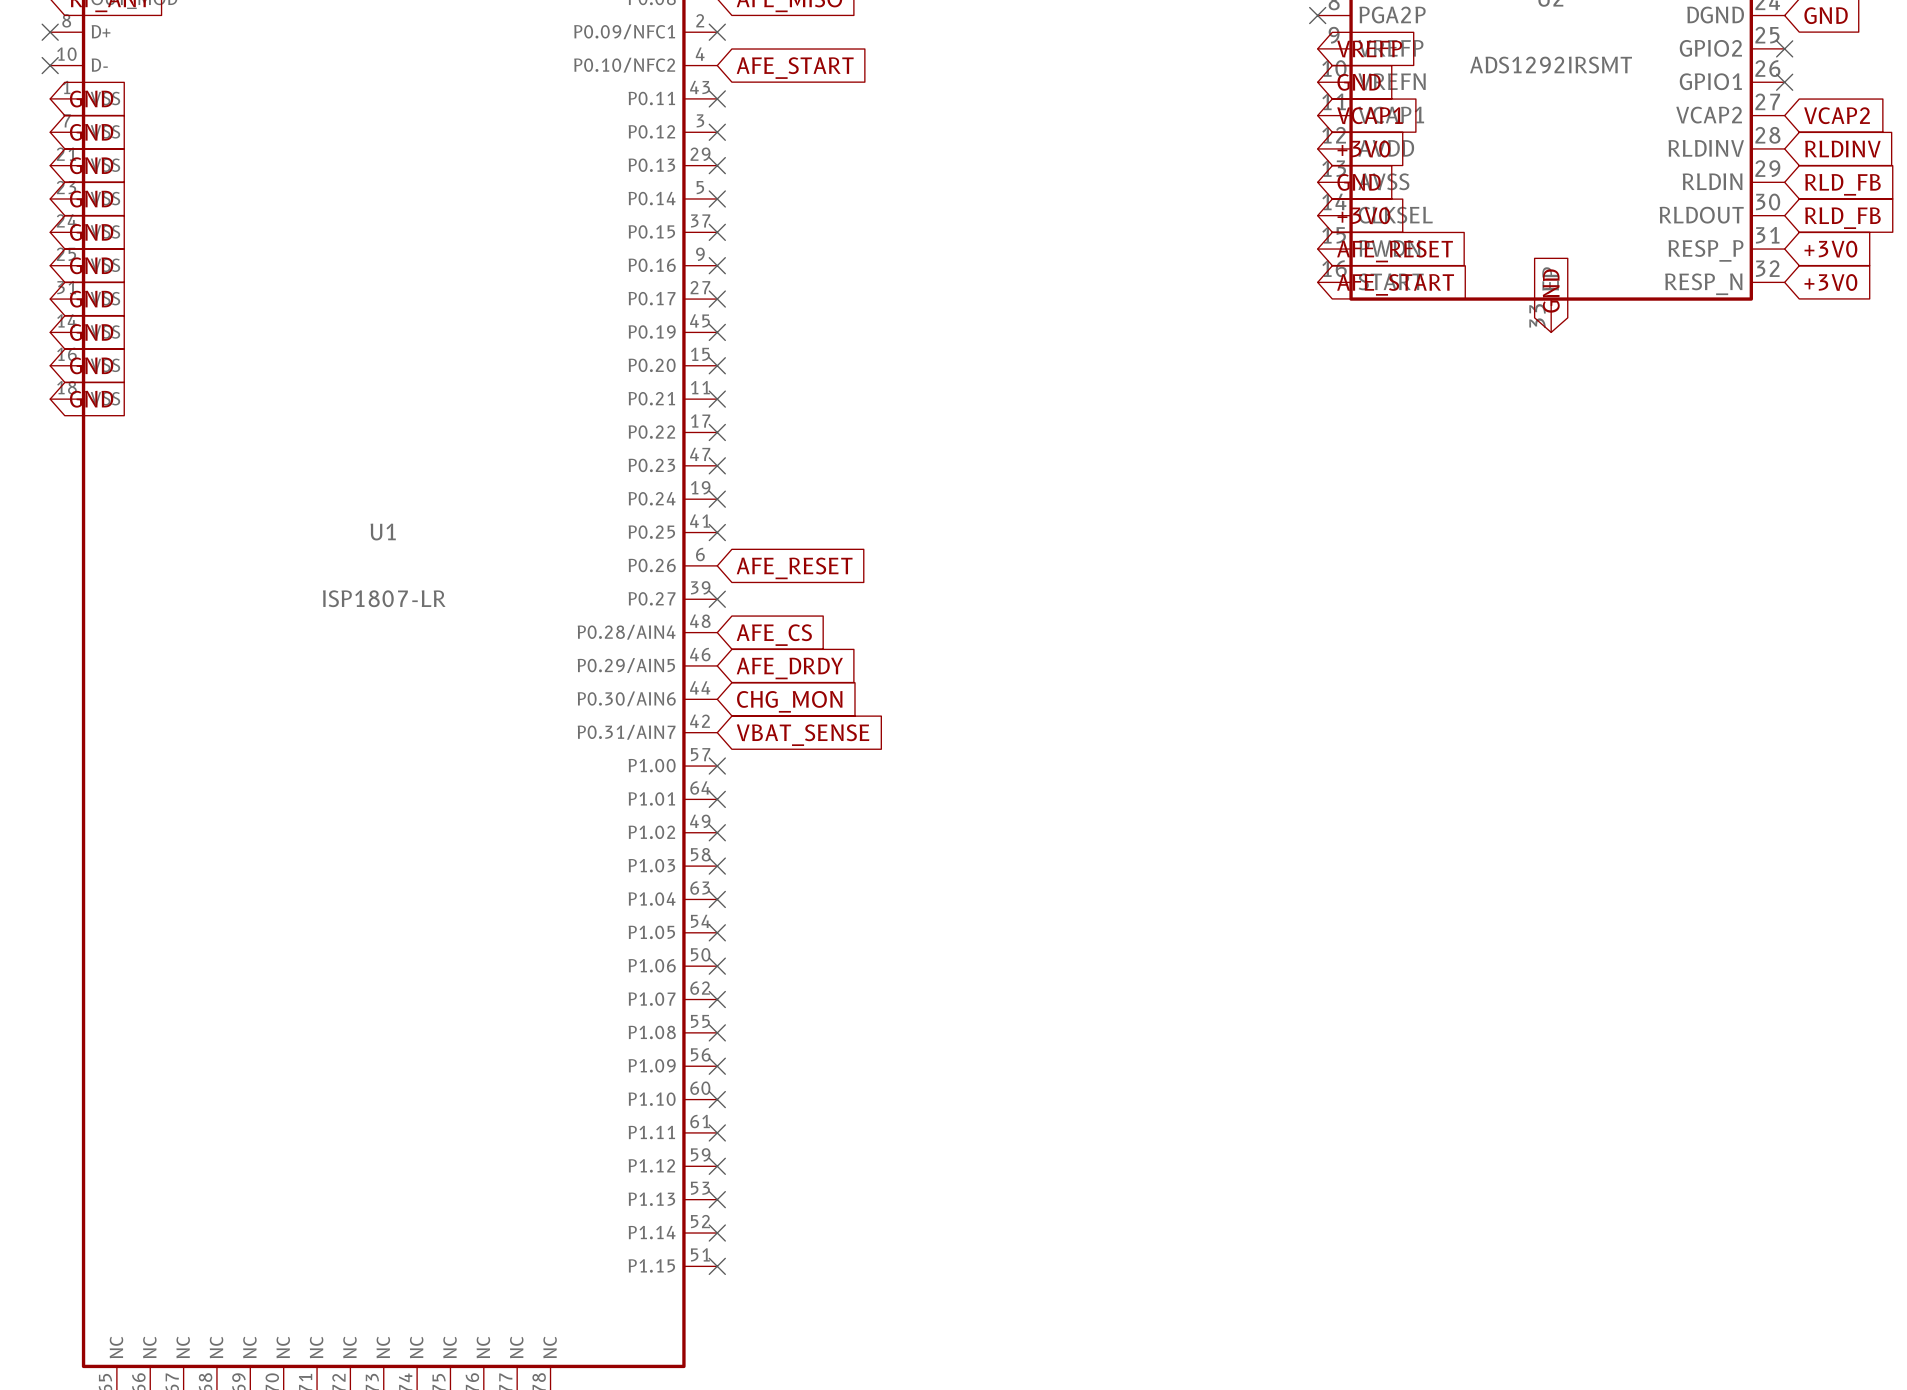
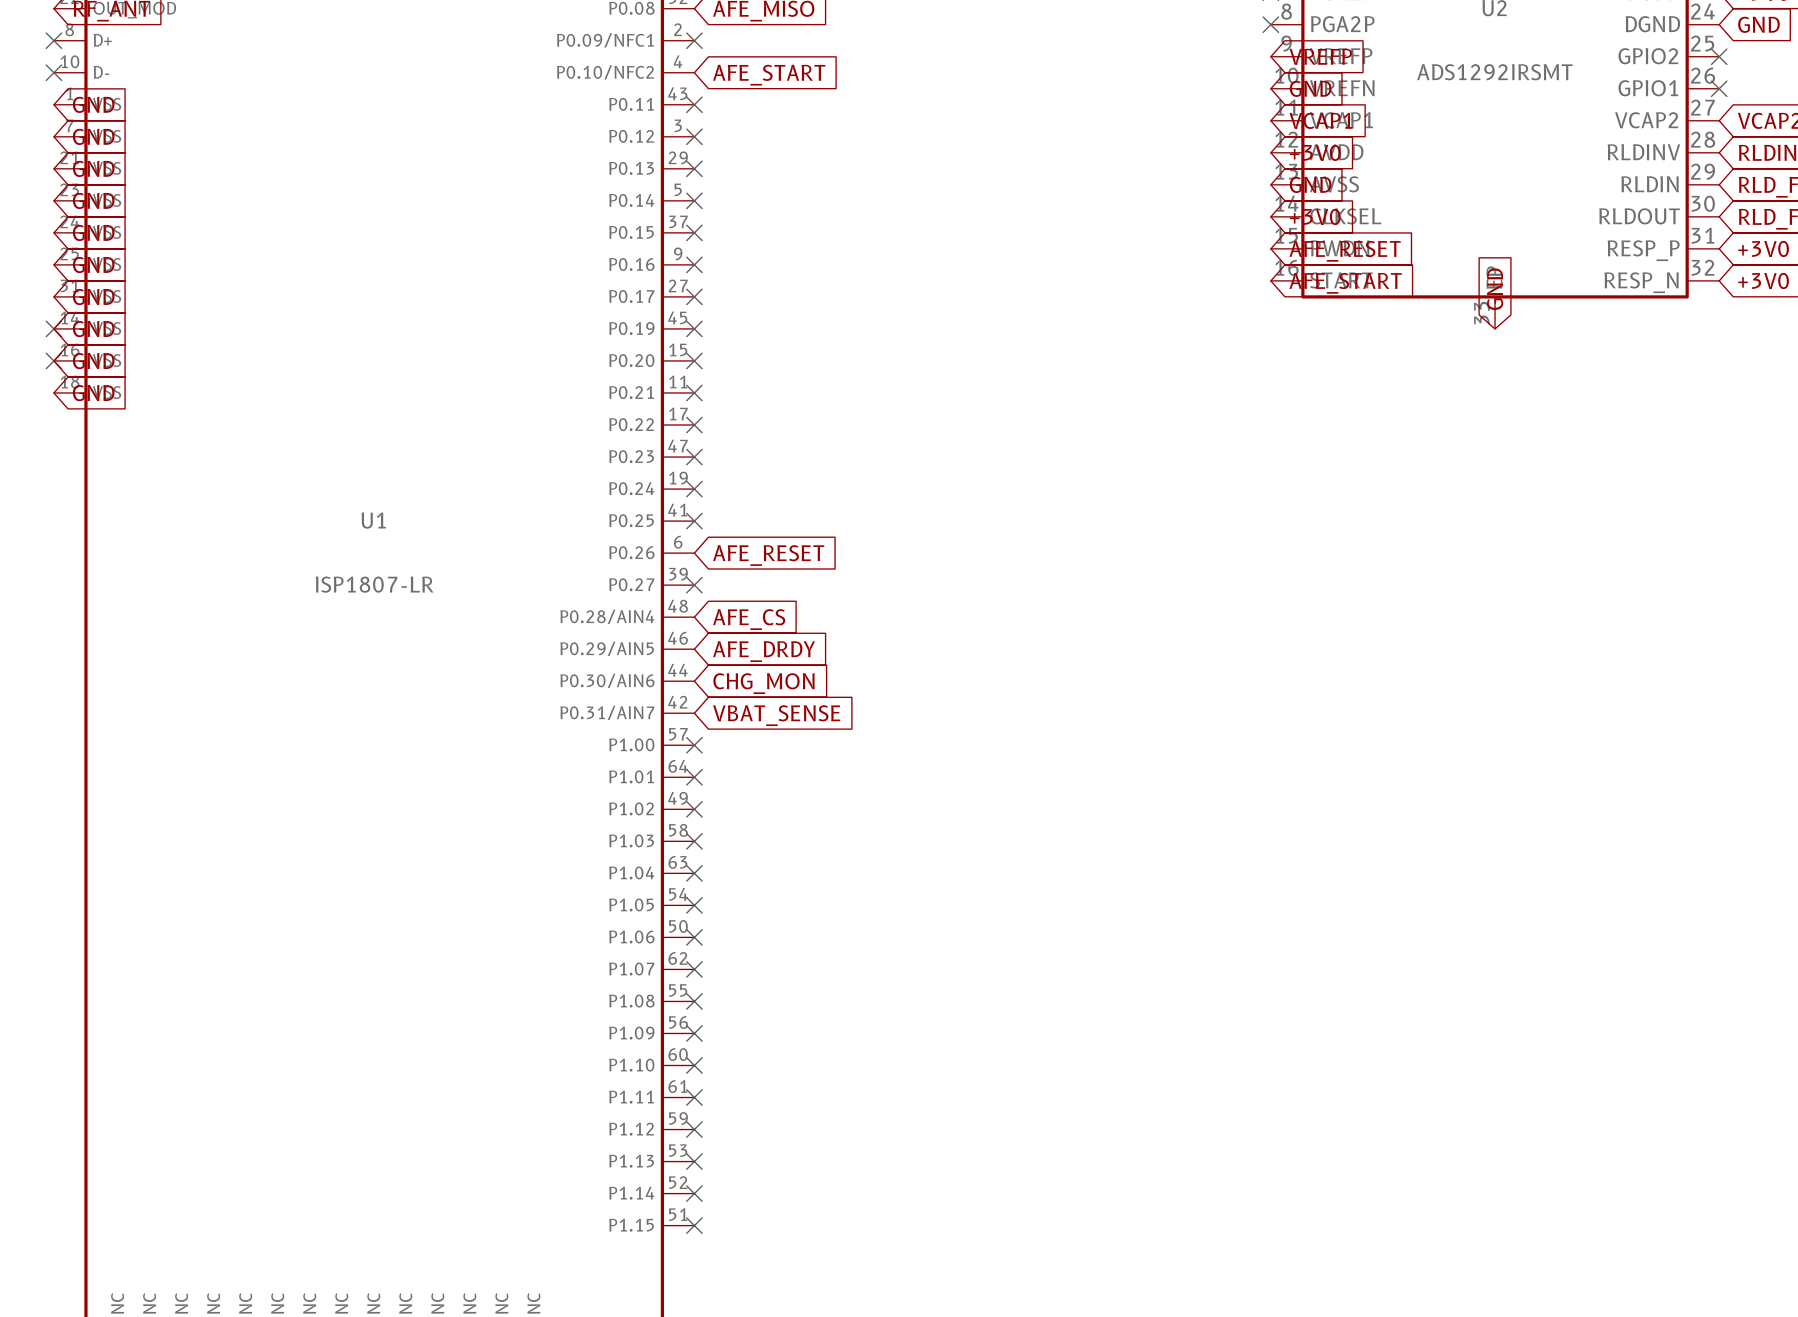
no-connect mark: none -> (53, 328)
no-connect mark: none -> (53, 360)

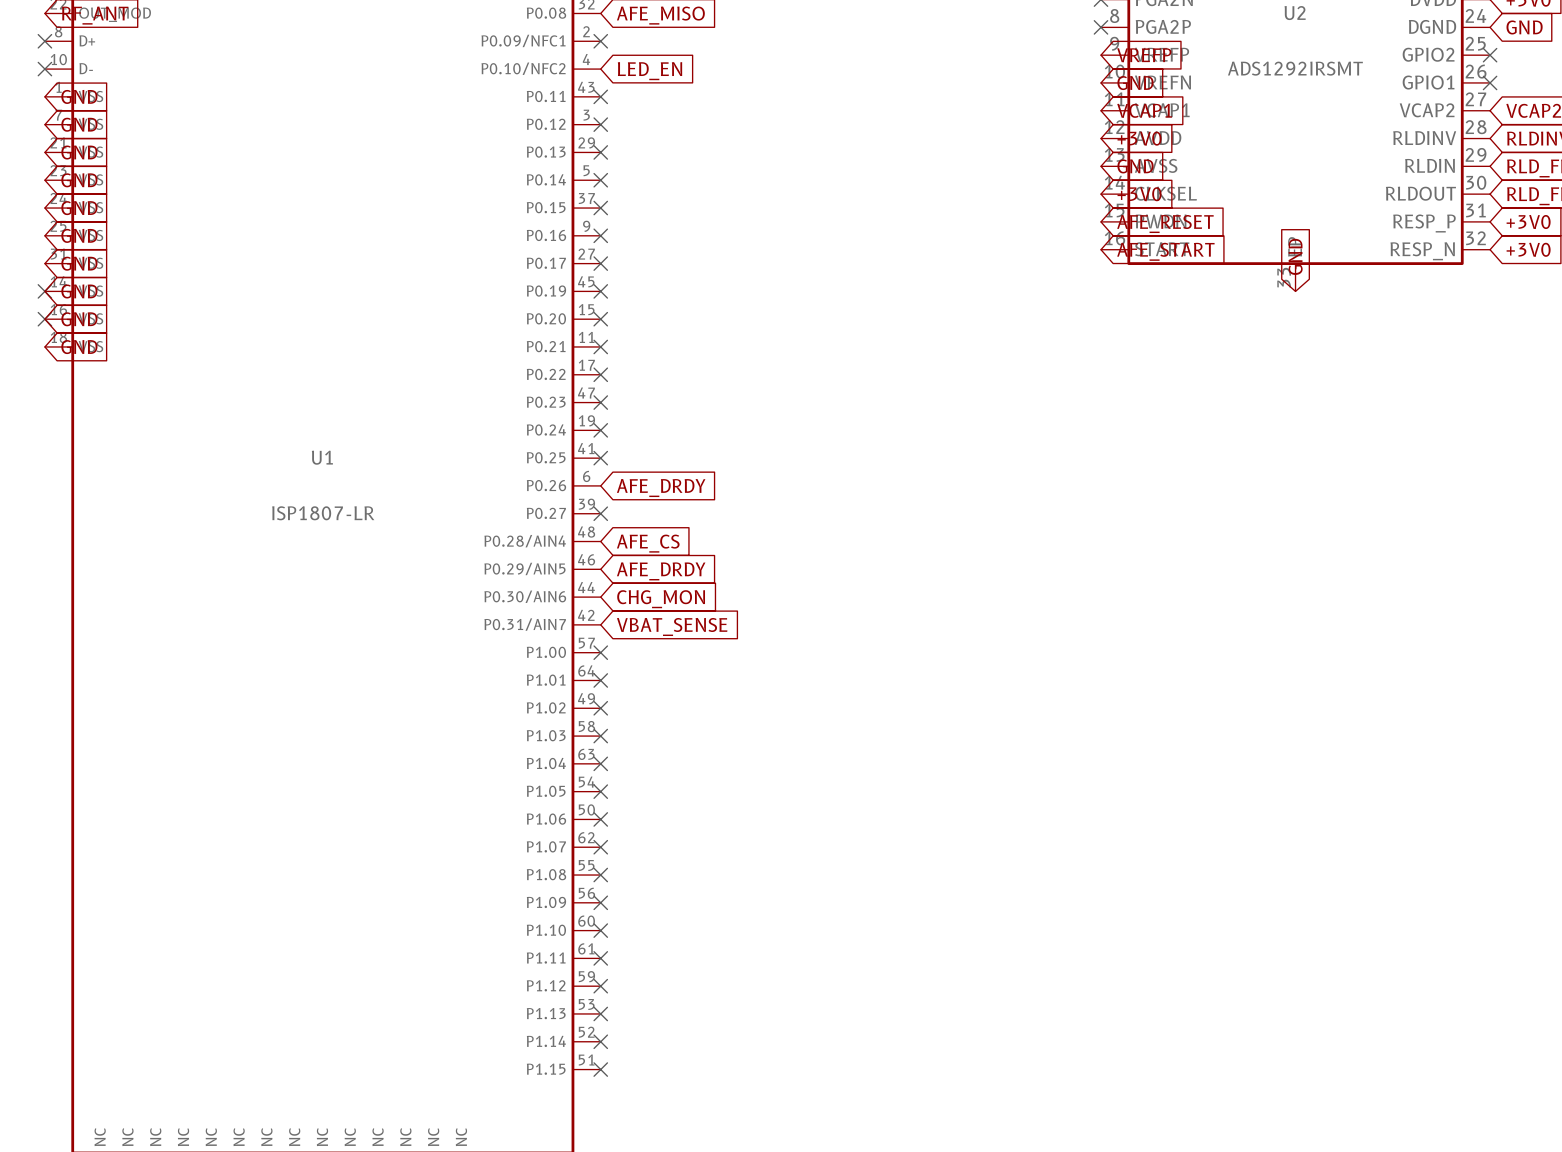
global label: AFE_START (769, 75) -> LED_EN (649, 71)
global label: AFE_RESET (768, 555) -> AFE_DRDY (661, 488)

